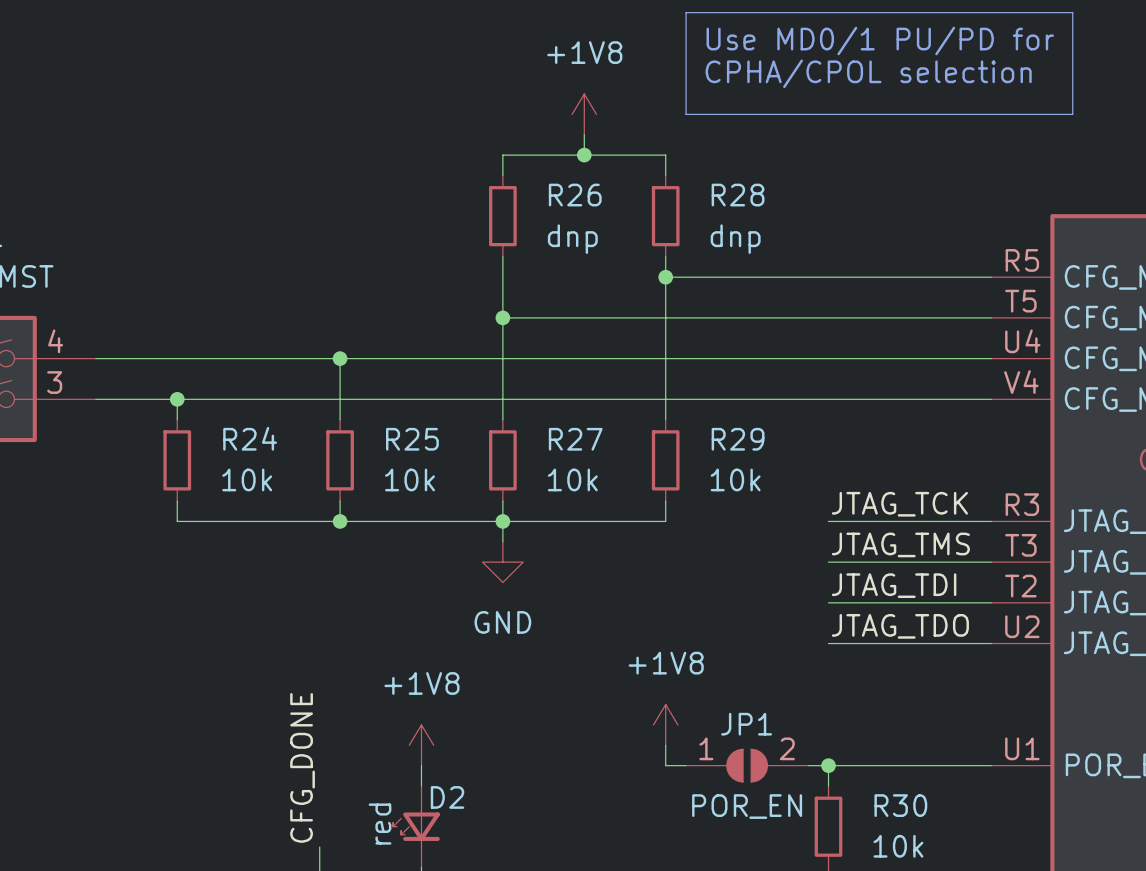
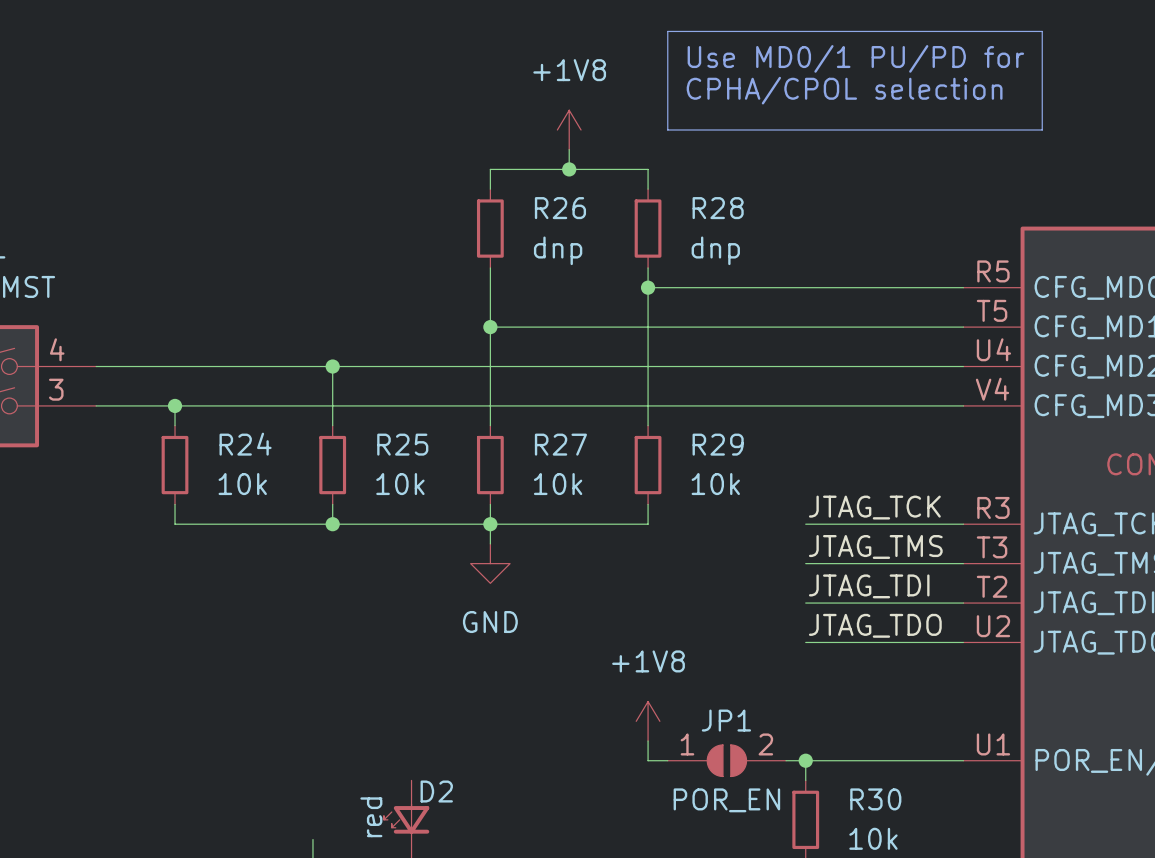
power symbol: +1V8 (421, 745) -> none
wire: (421, 765) (421, 786) -> none
label: CFG_DONE (302, 767) -> none

